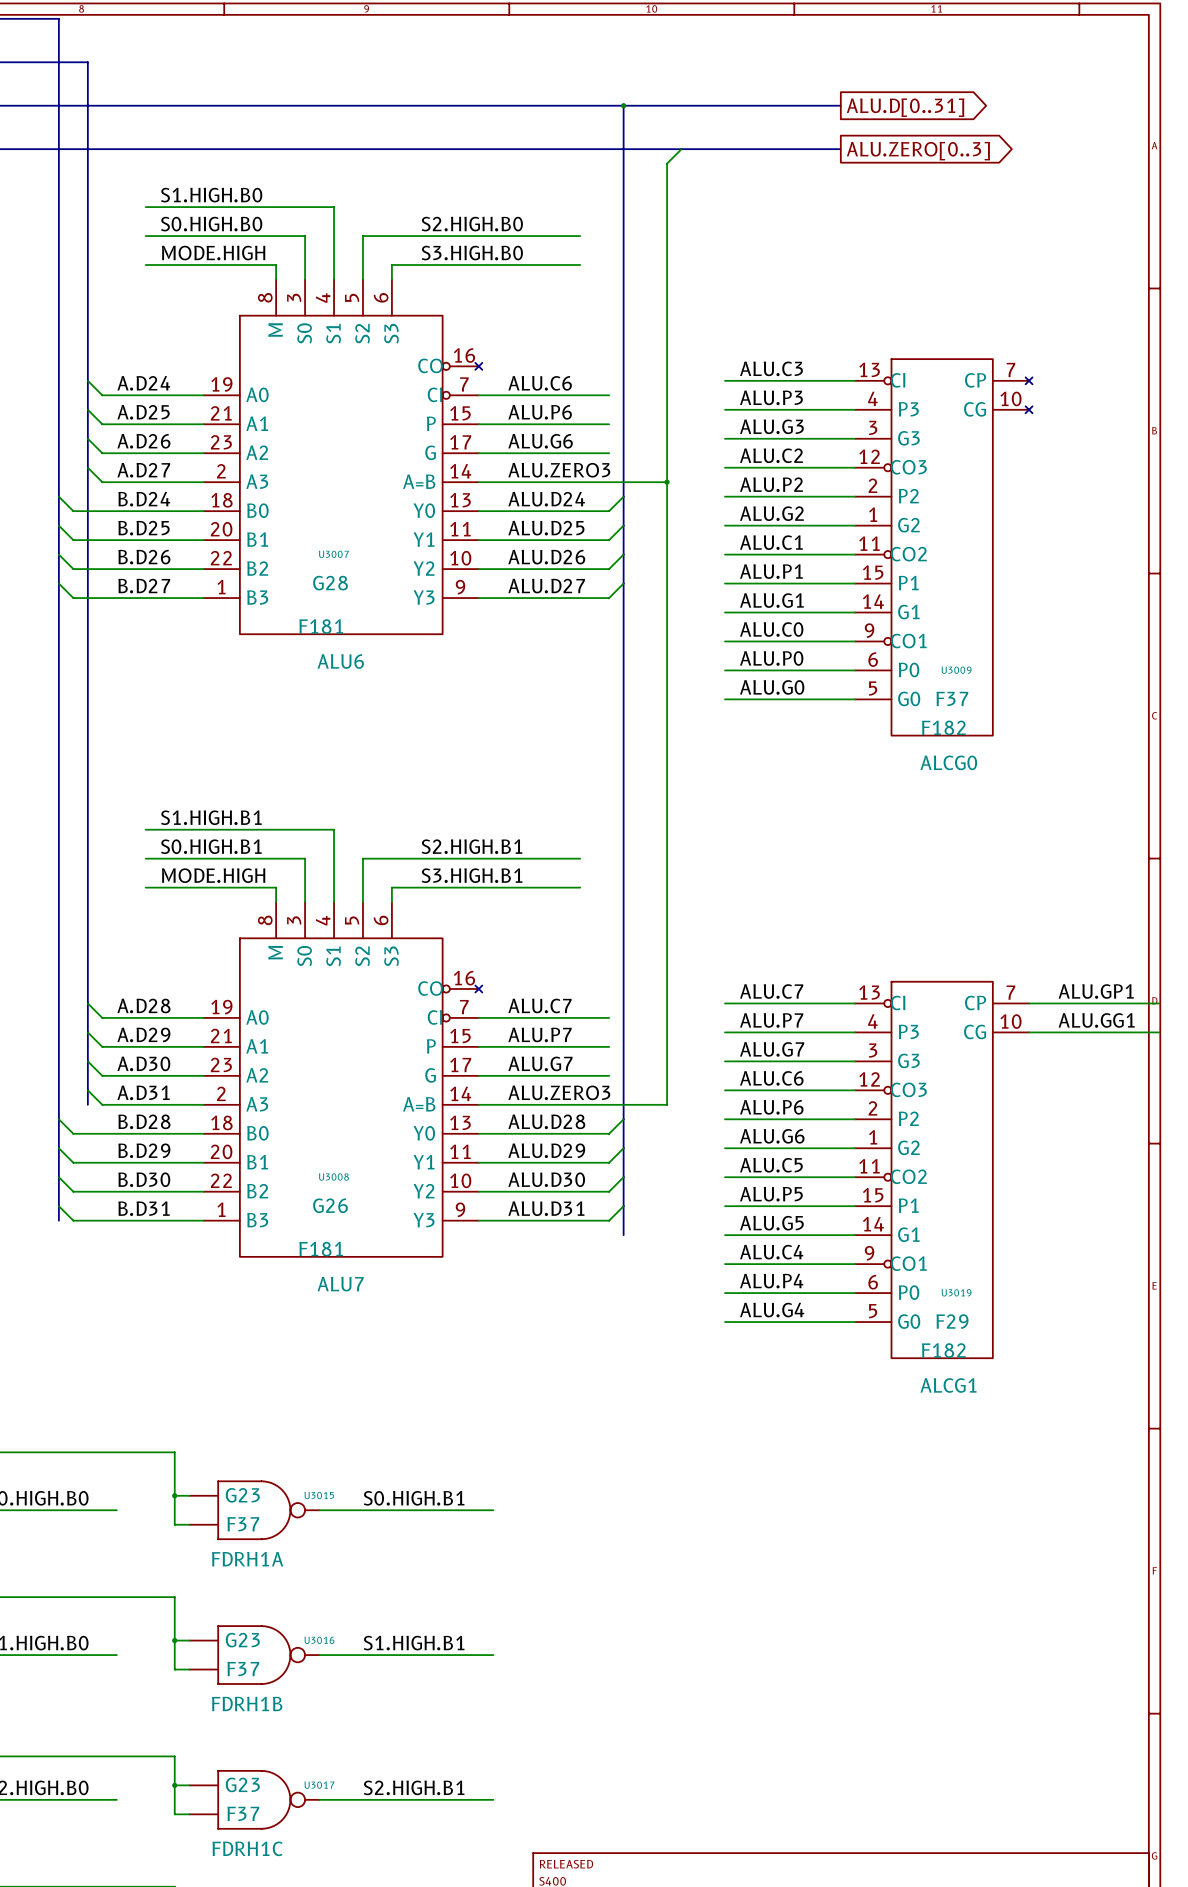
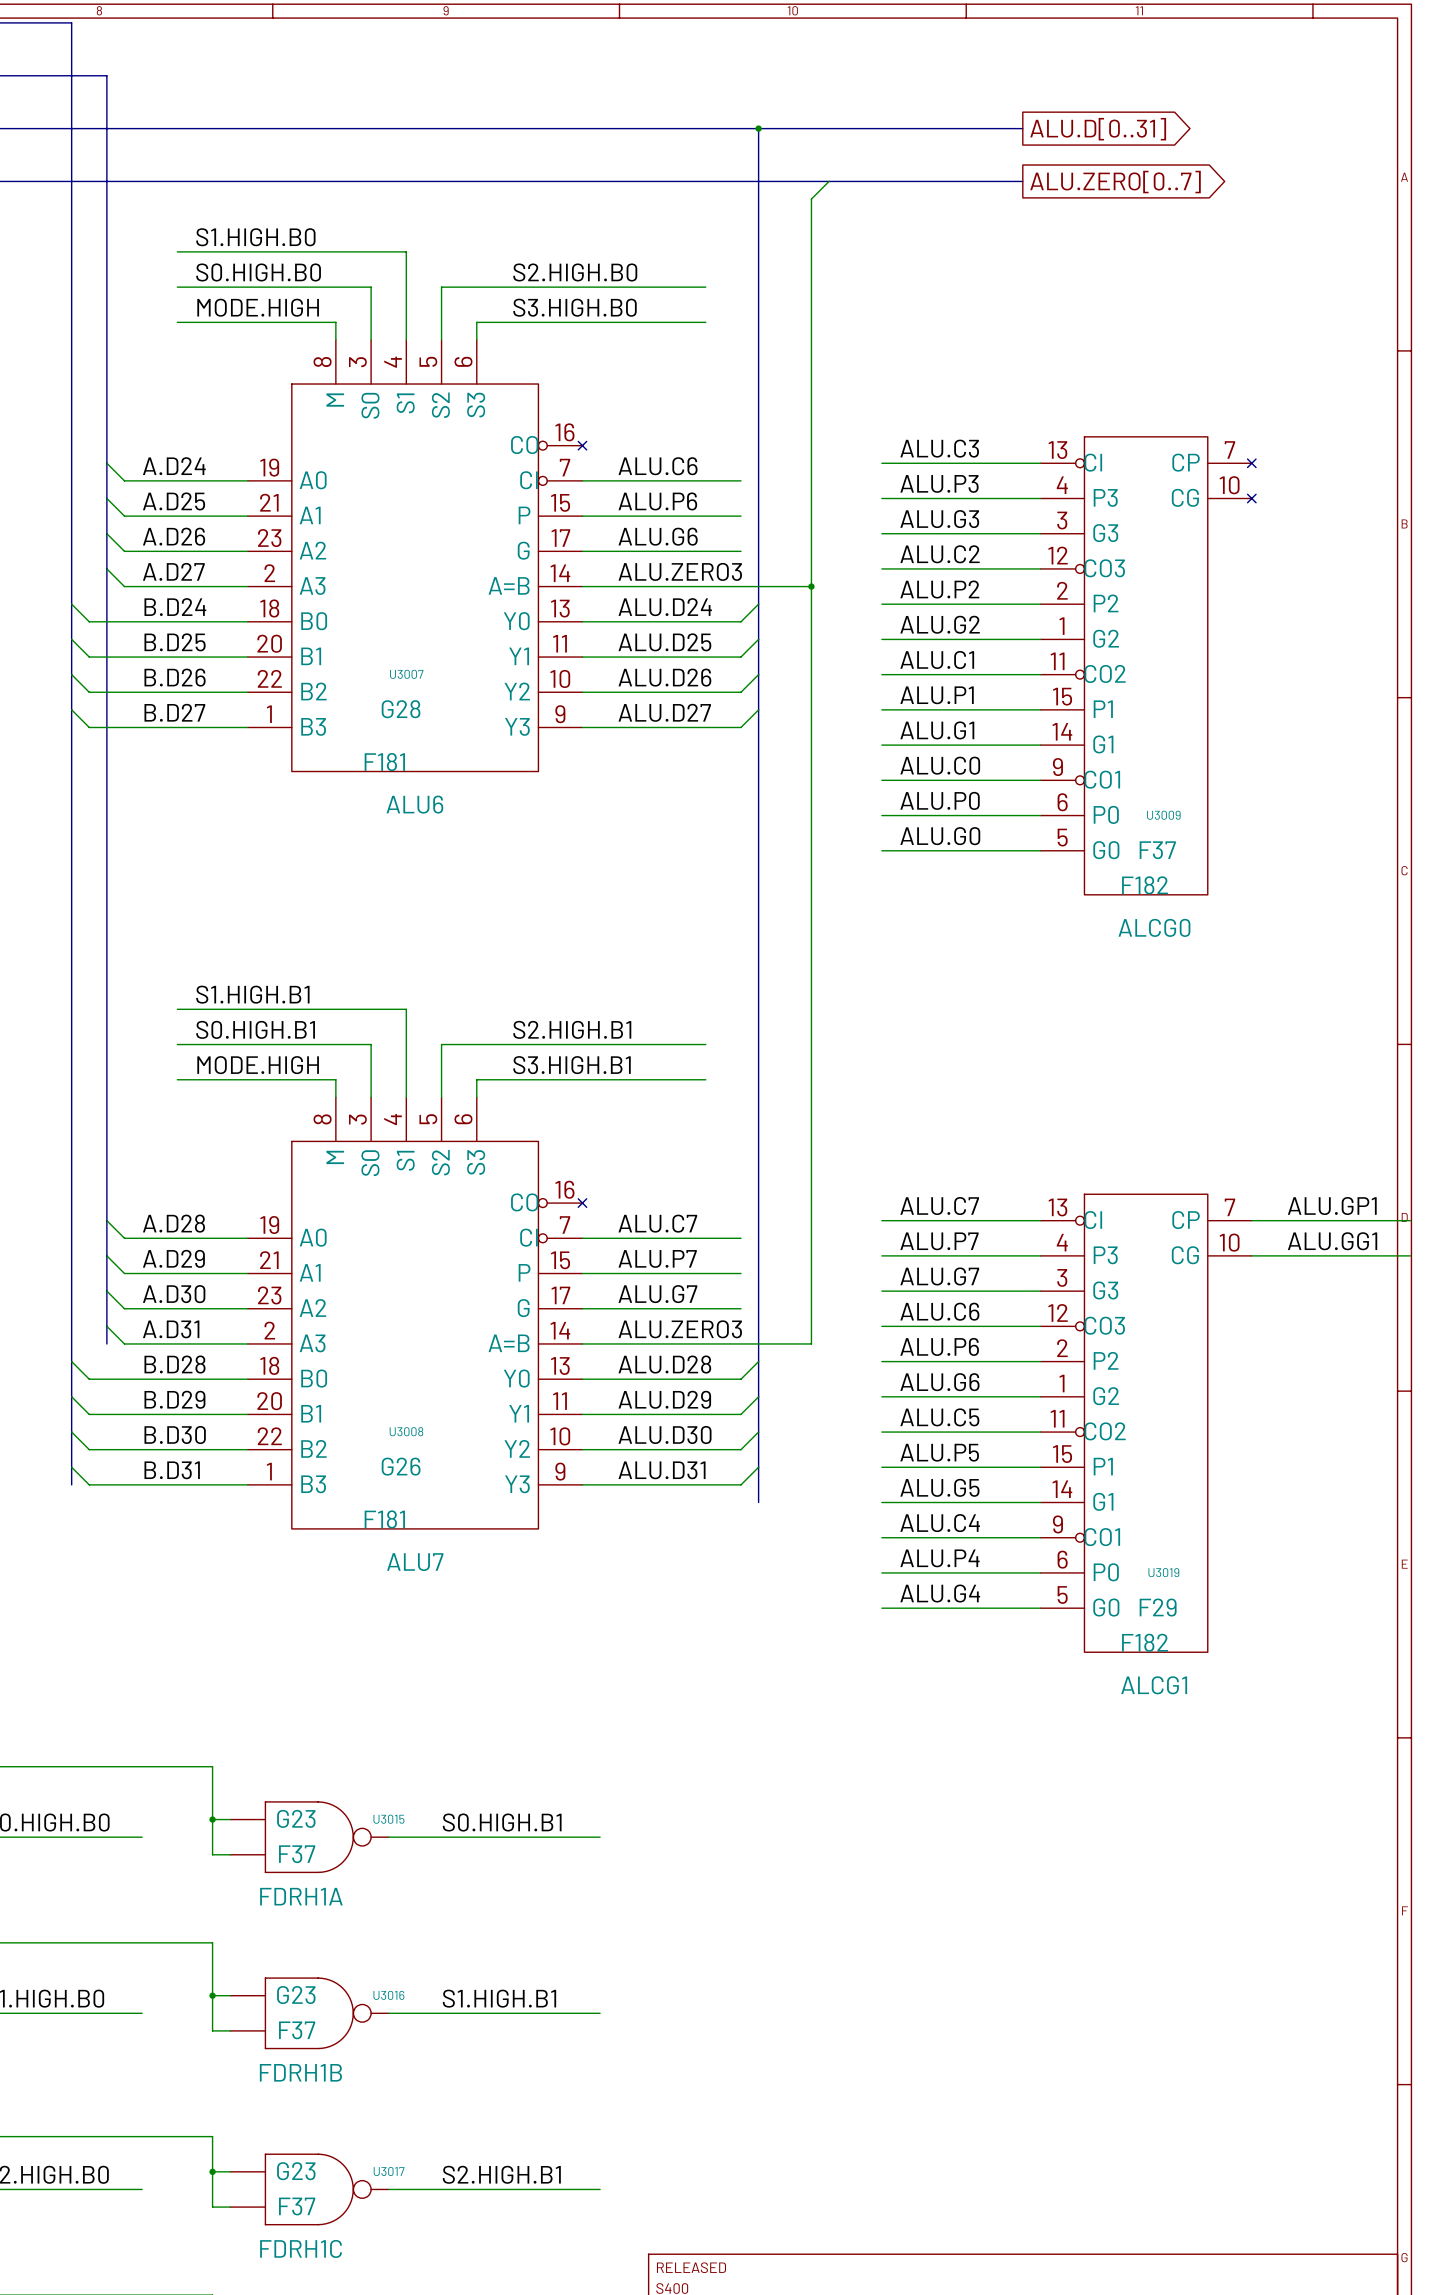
global label: ALU.ZERO[0..3] (918, 151) -> ALU.ZERO[0..7] (1115, 182)

